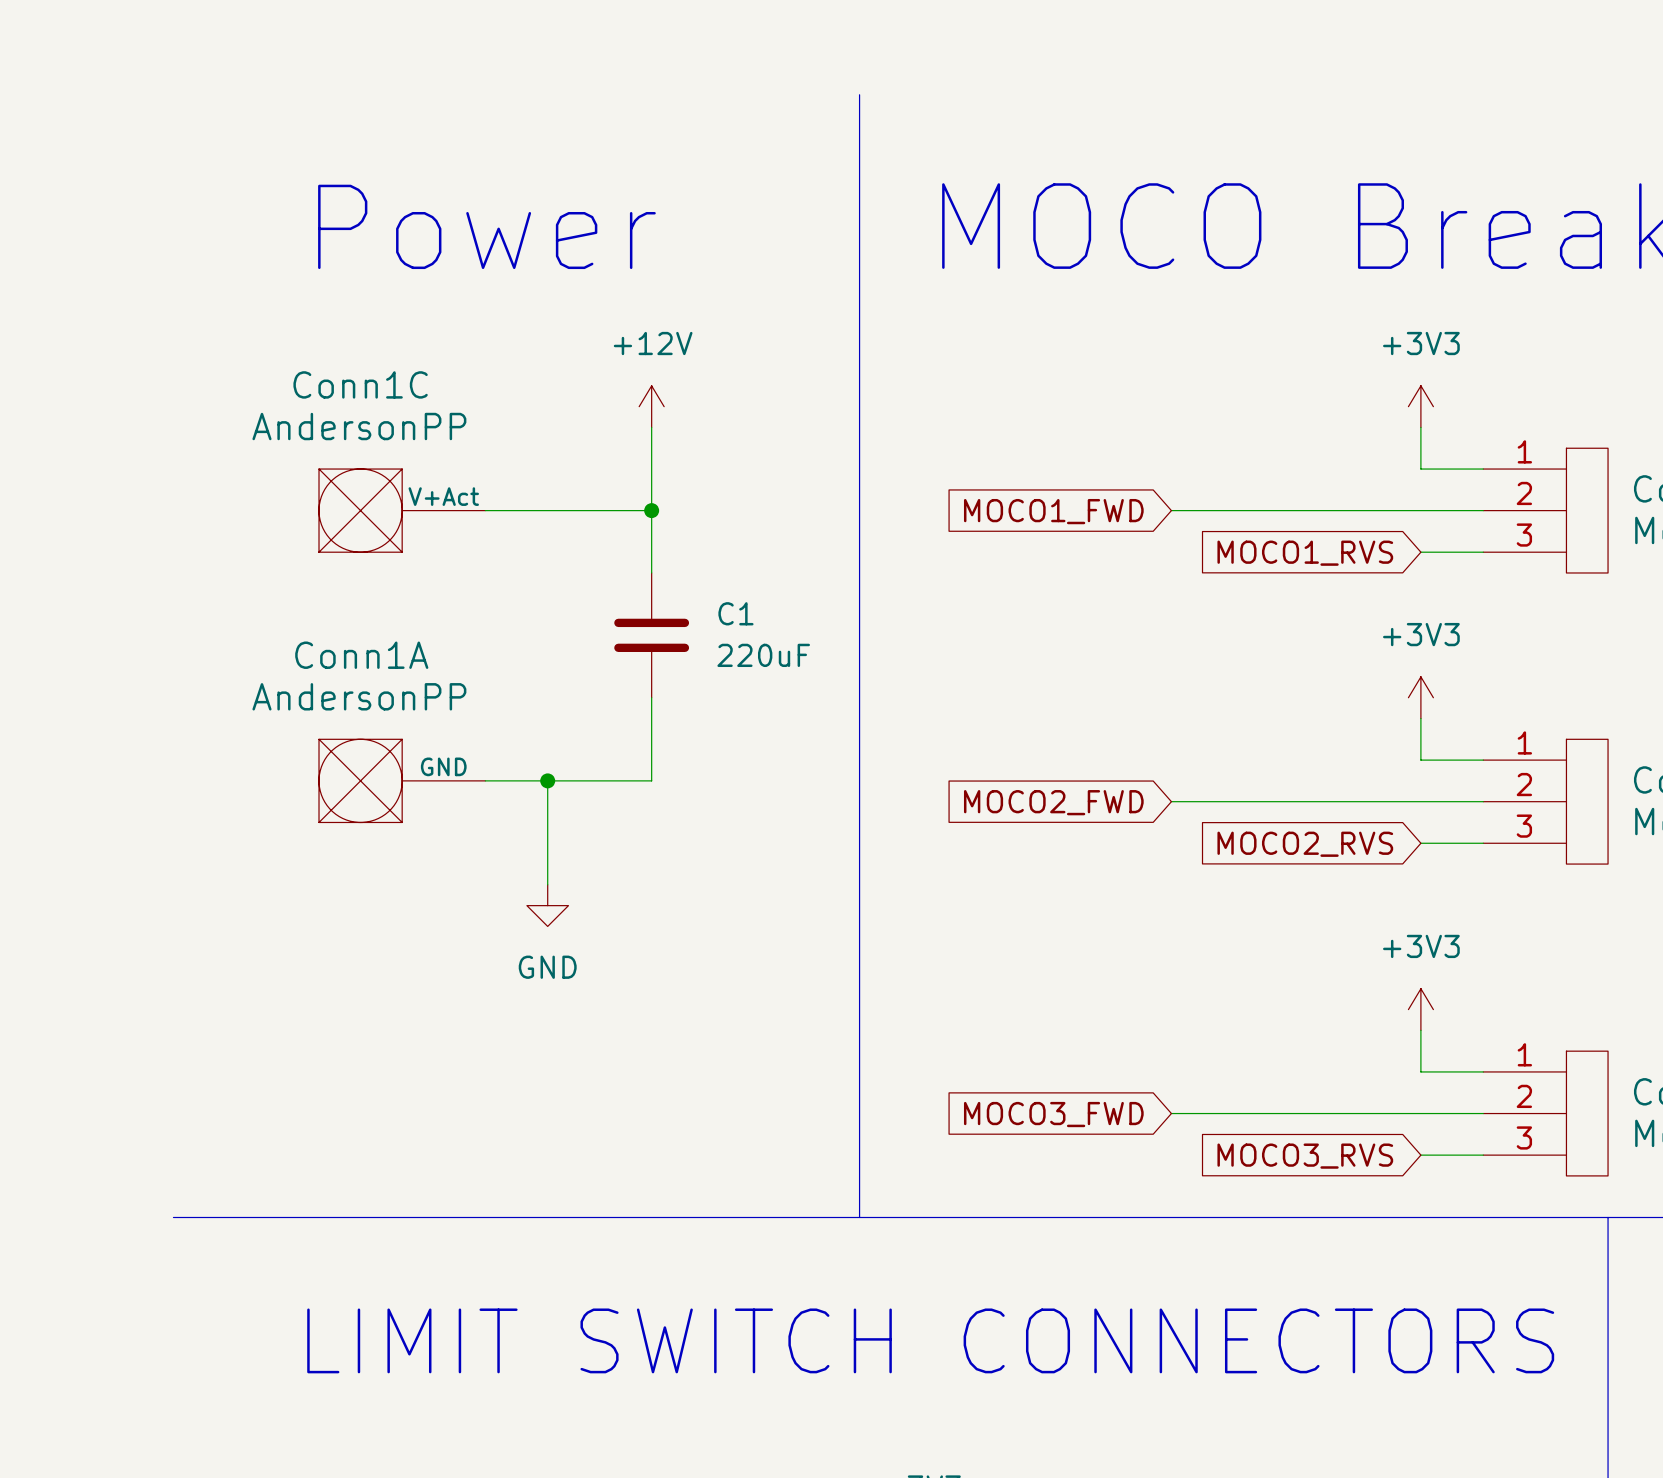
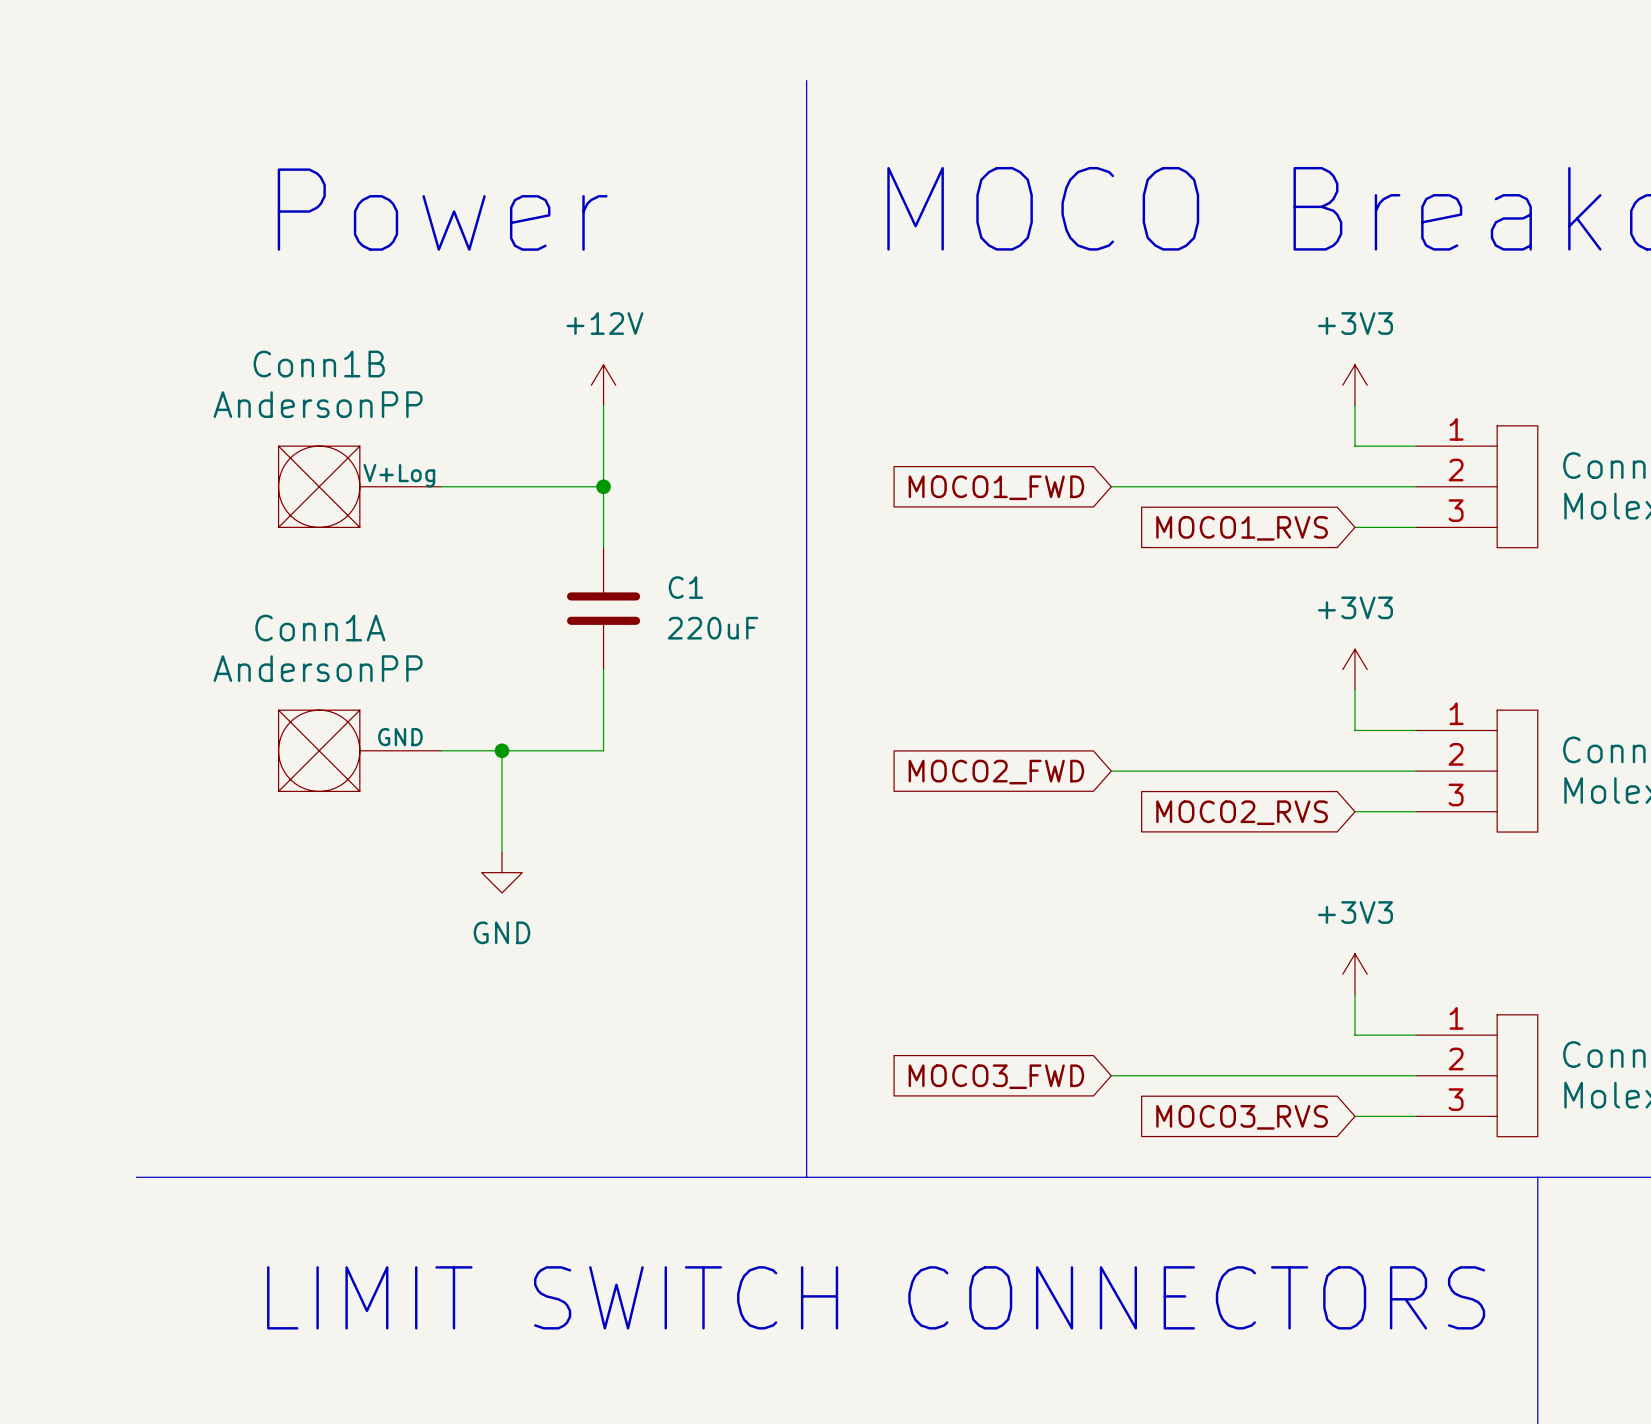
Conn1C name: Conn1C (360, 384) -> Conn1B (319, 364)
Conn1C pin name: V+Act (443, 496) -> V+Log (399, 475)

